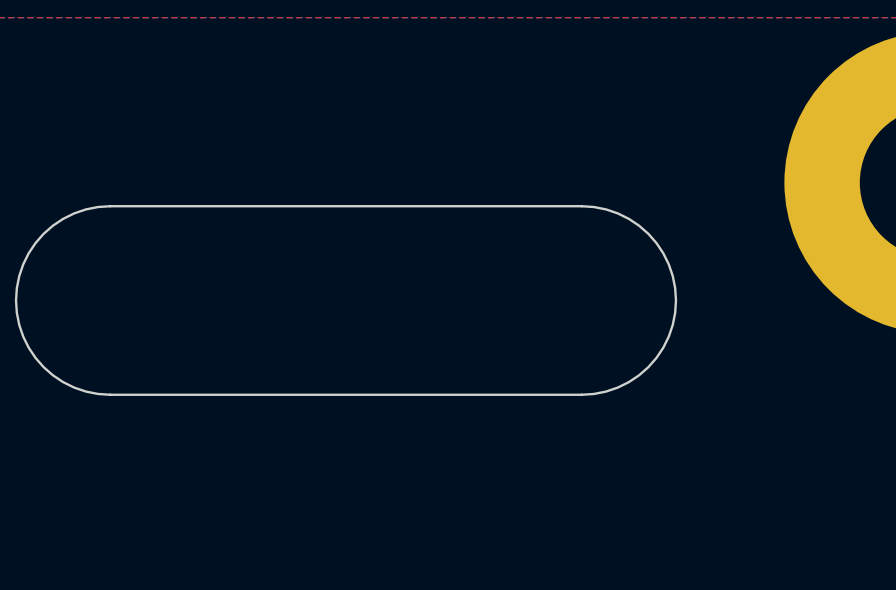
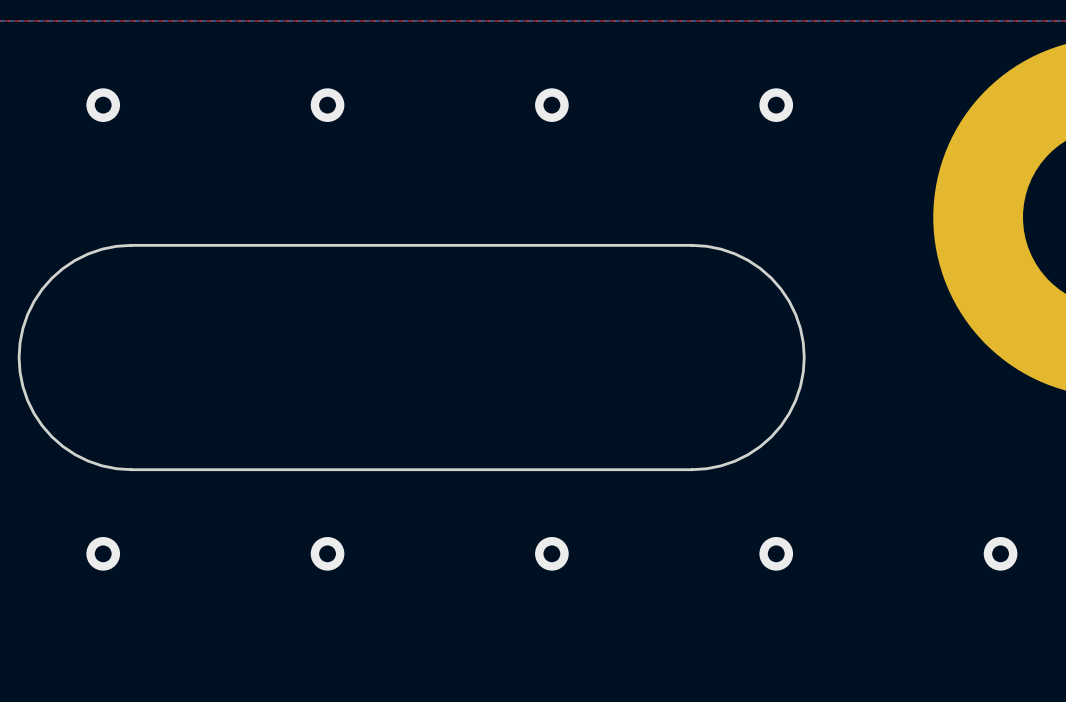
via: none -> (103, 105)
via: none -> (327, 105)
via: none -> (551, 105)
via: none -> (776, 105)
via: none -> (103, 553)
via: none -> (327, 553)
via: none -> (551, 553)
via: none -> (776, 553)
via: none -> (1000, 553)

